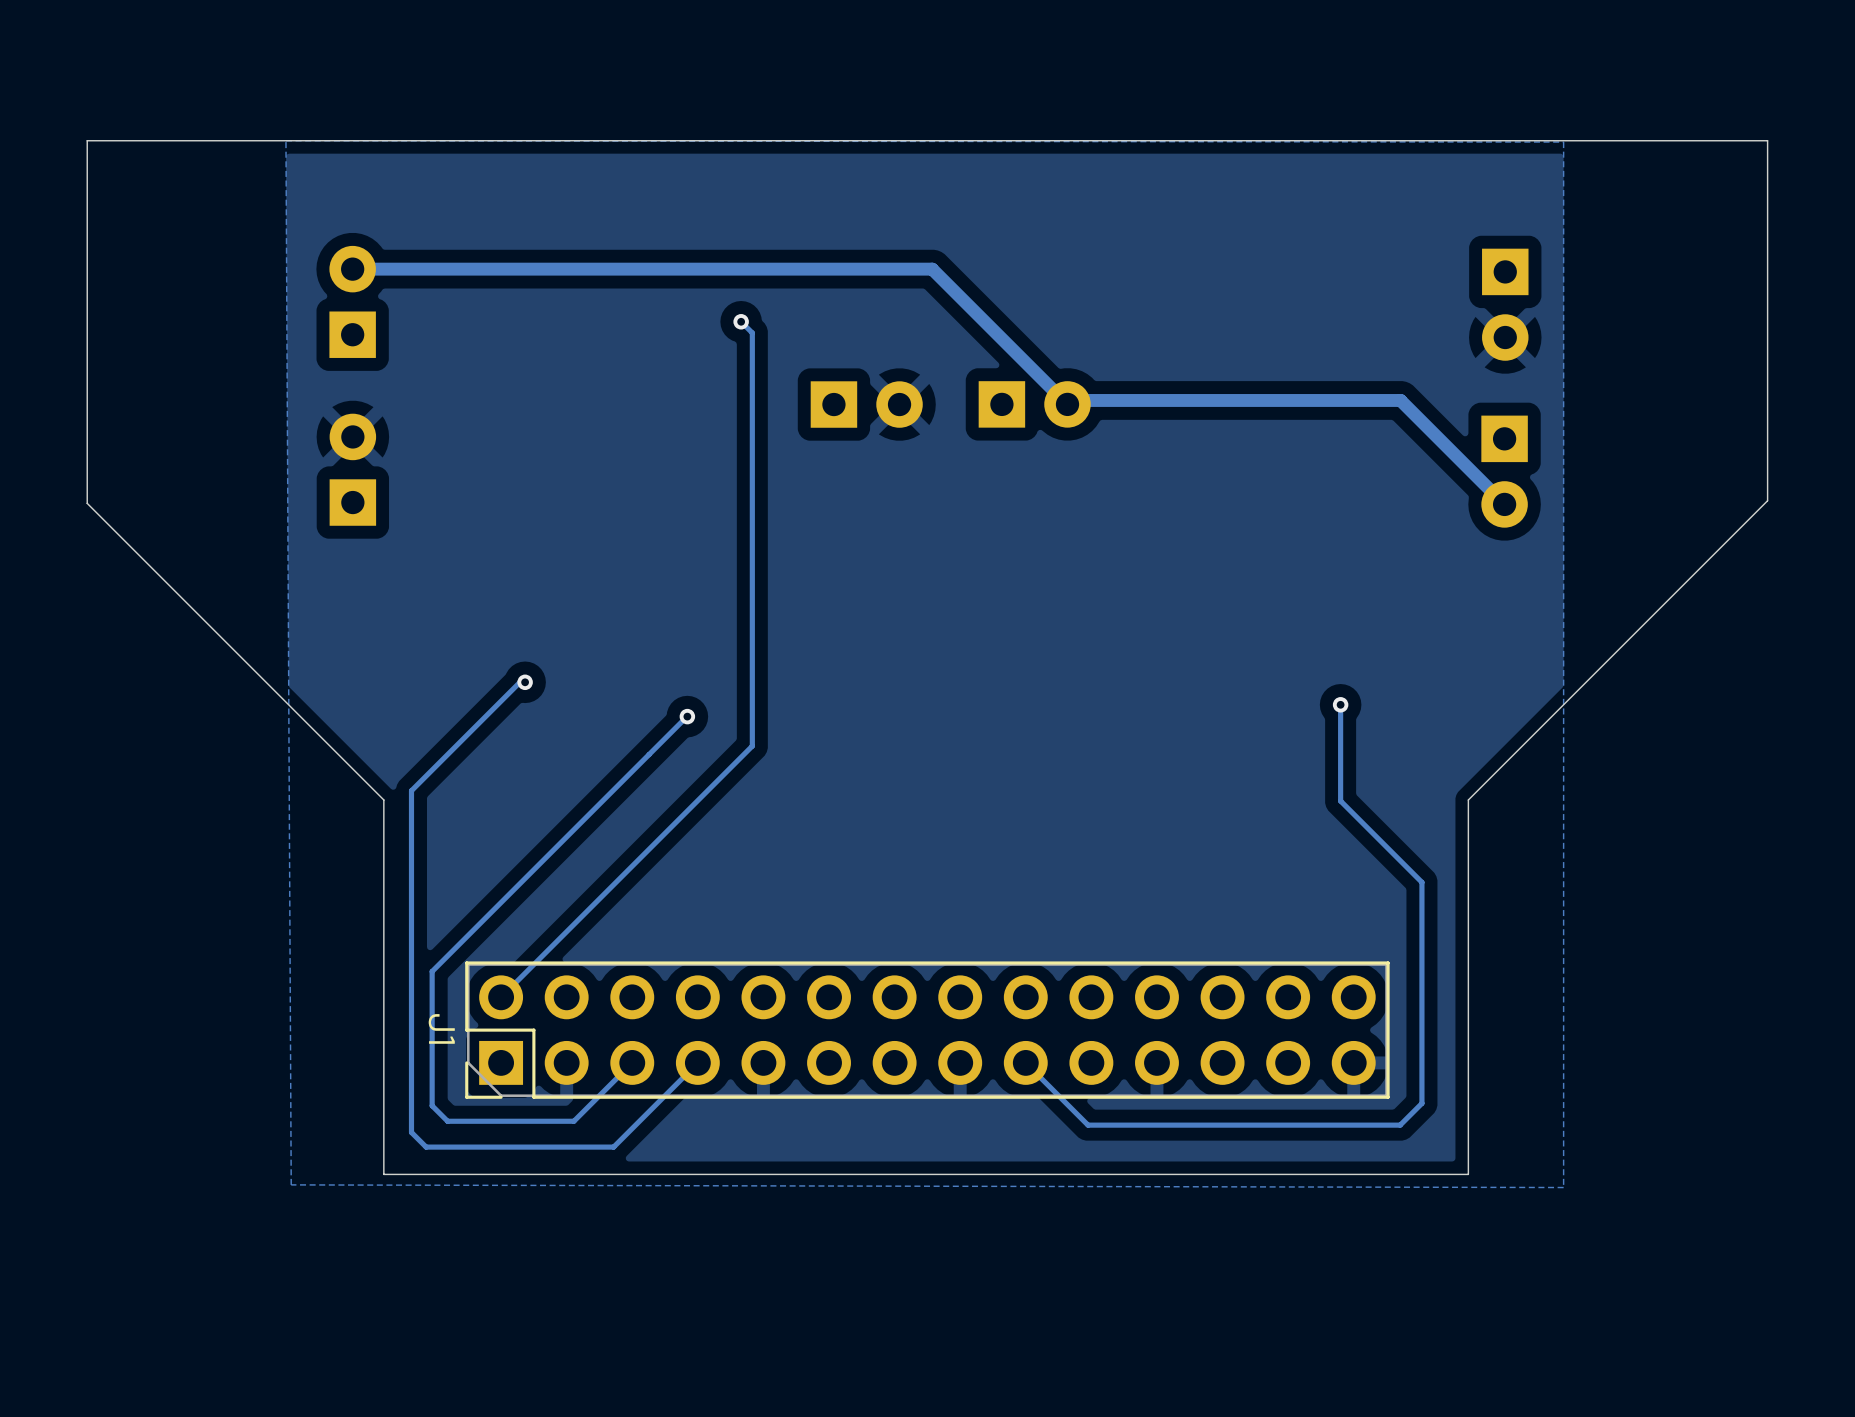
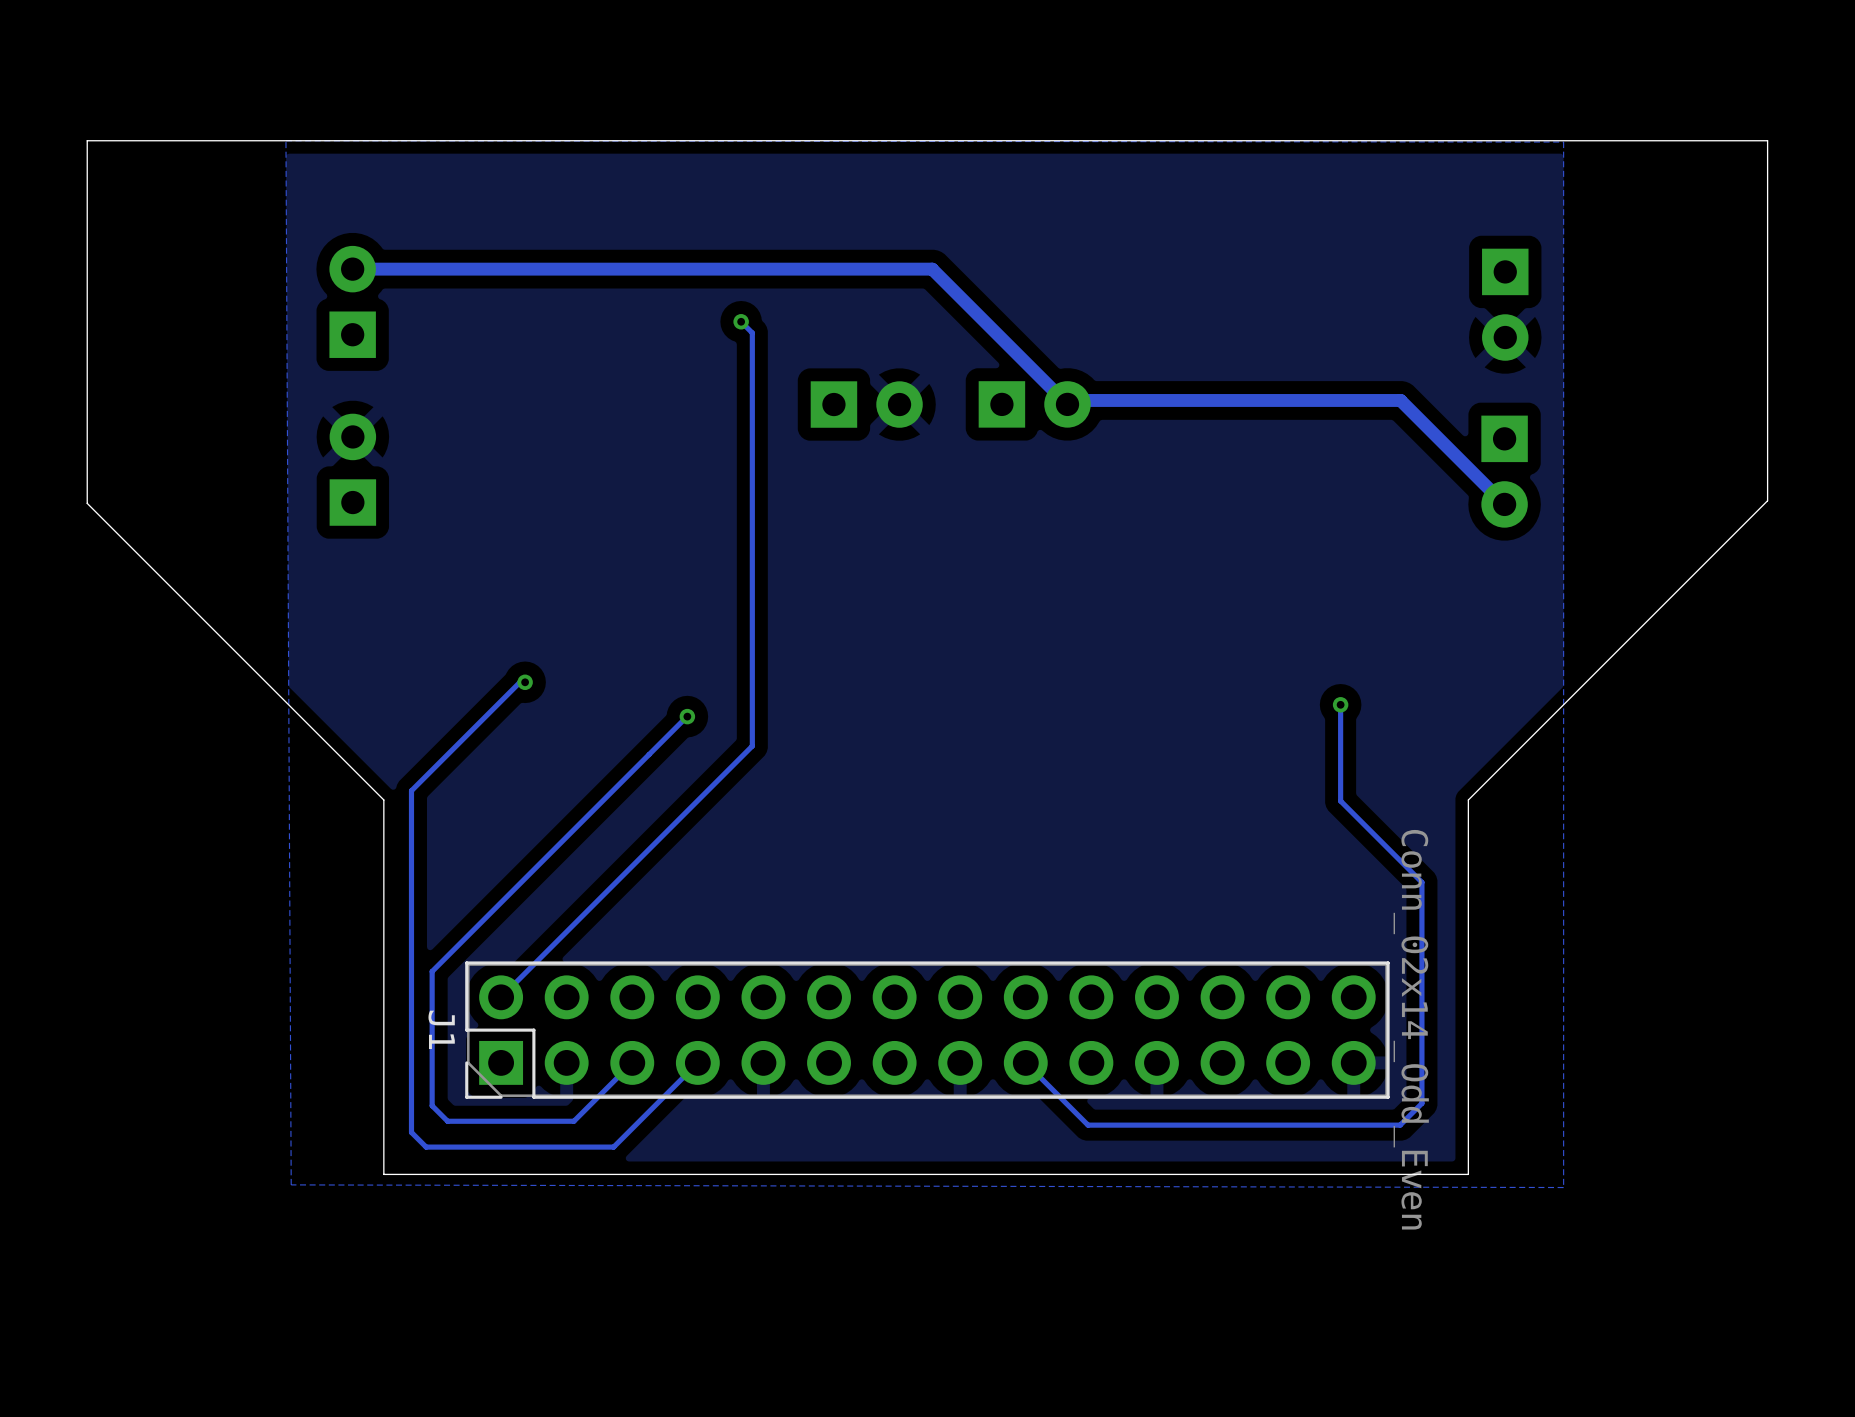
J1 value: none -> Conn_02x14_Odd_Even (1411, 1029)

